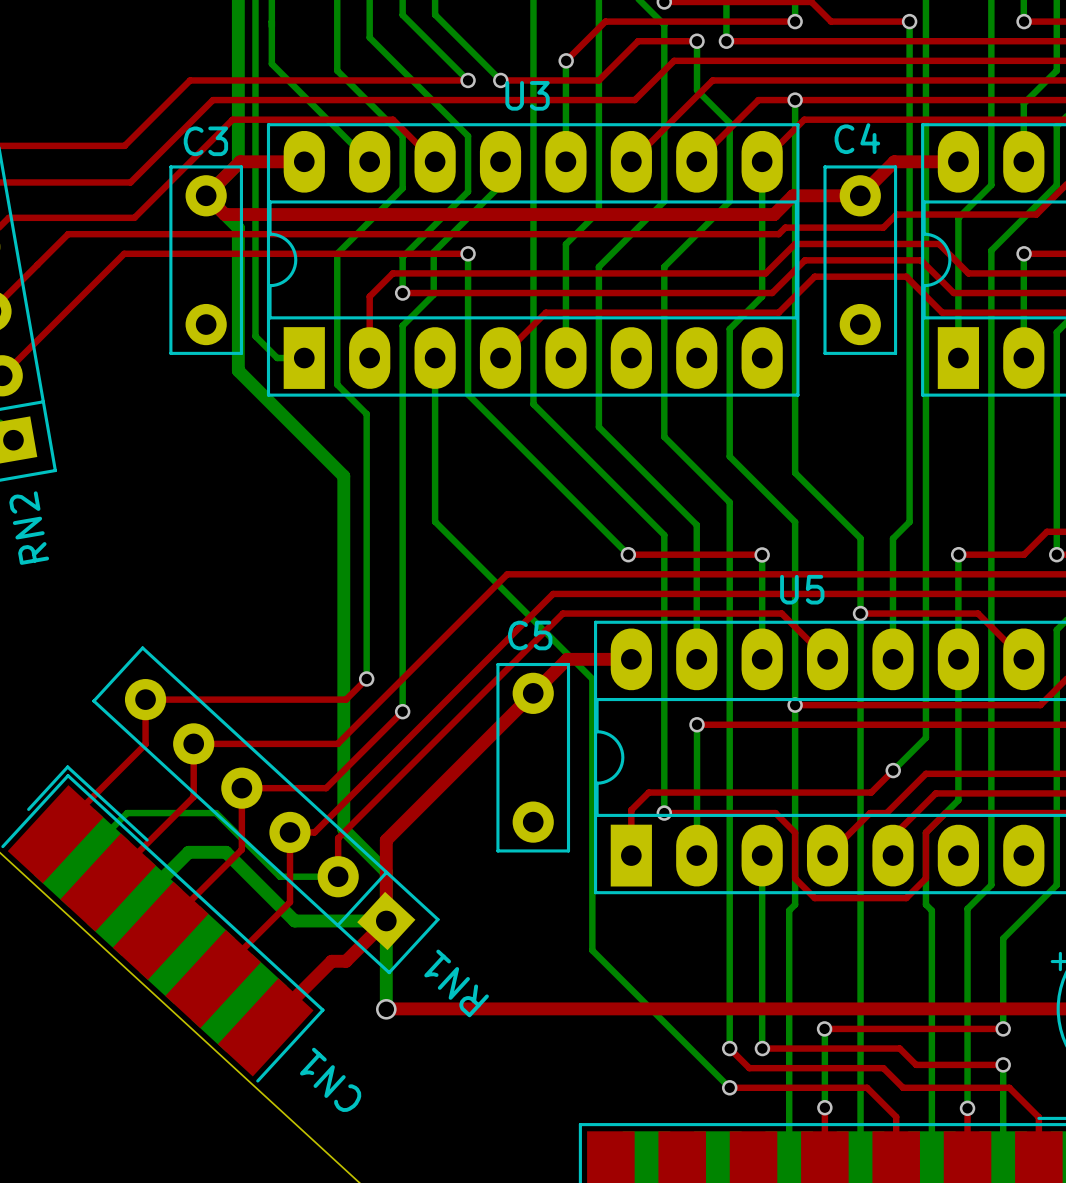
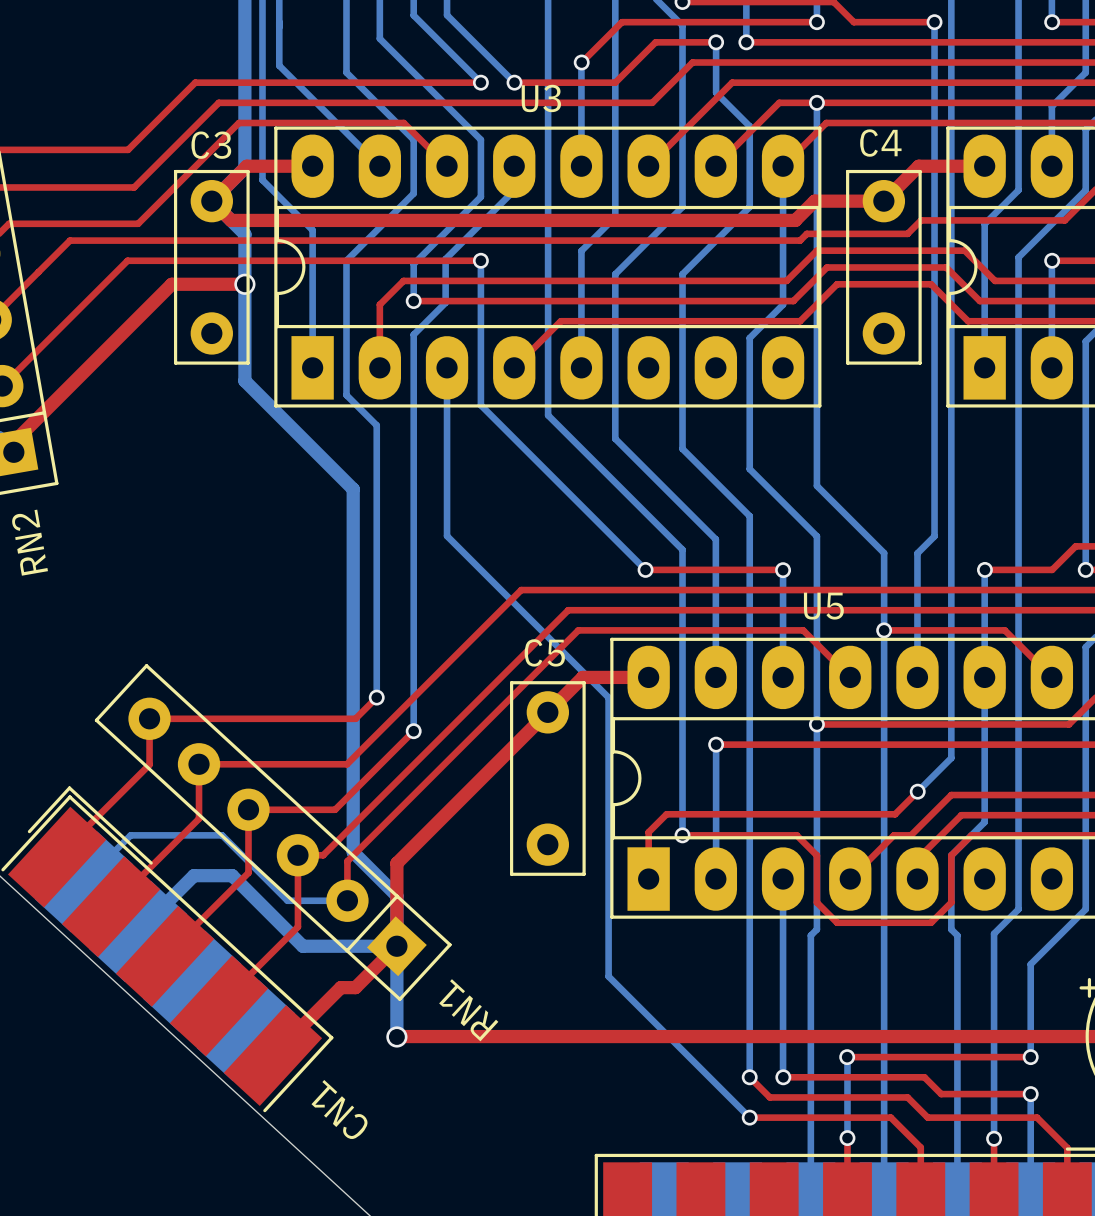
bottom track: (255, 175) (255, 336) (277, 358) (304, 358) -> (262, 180) (312, 230) (312, 367)
top track: none -> (244, 283) (171, 284) (13, 442) (13, 452)
via: none -> (244, 284)

